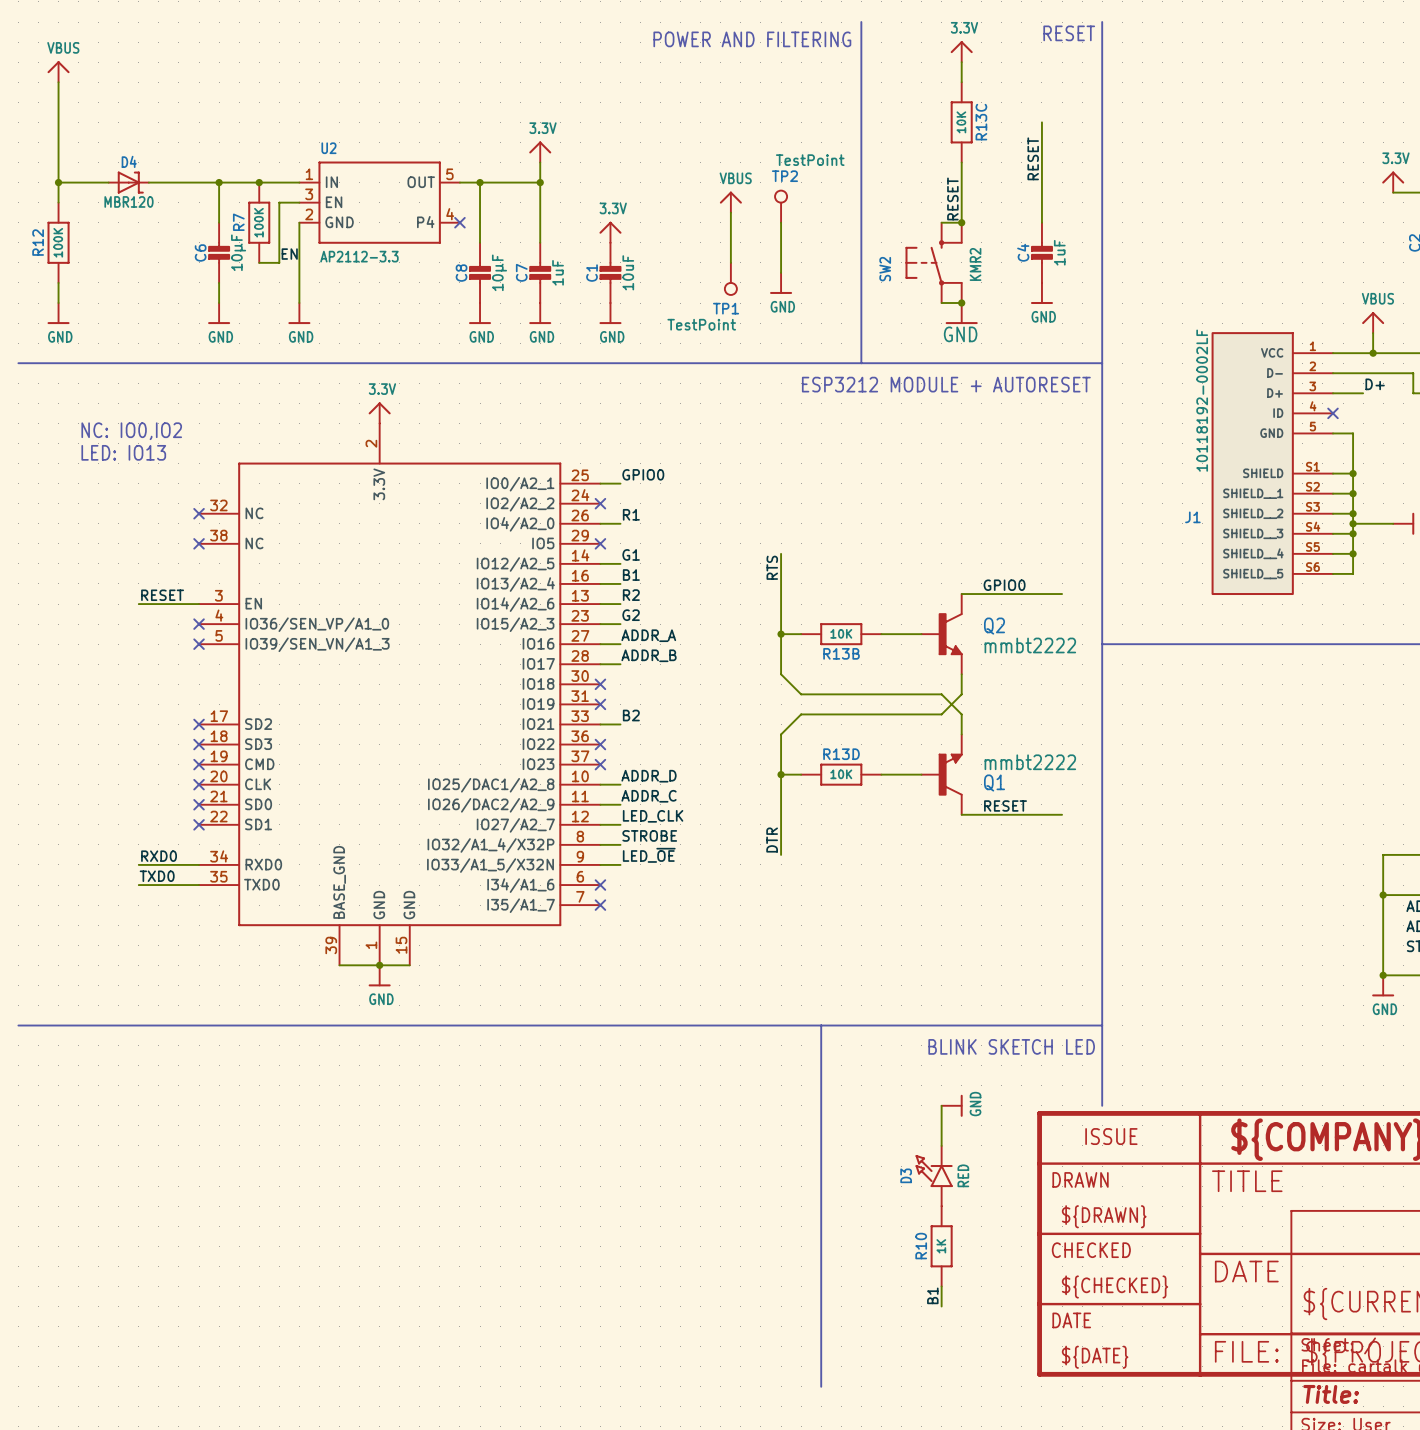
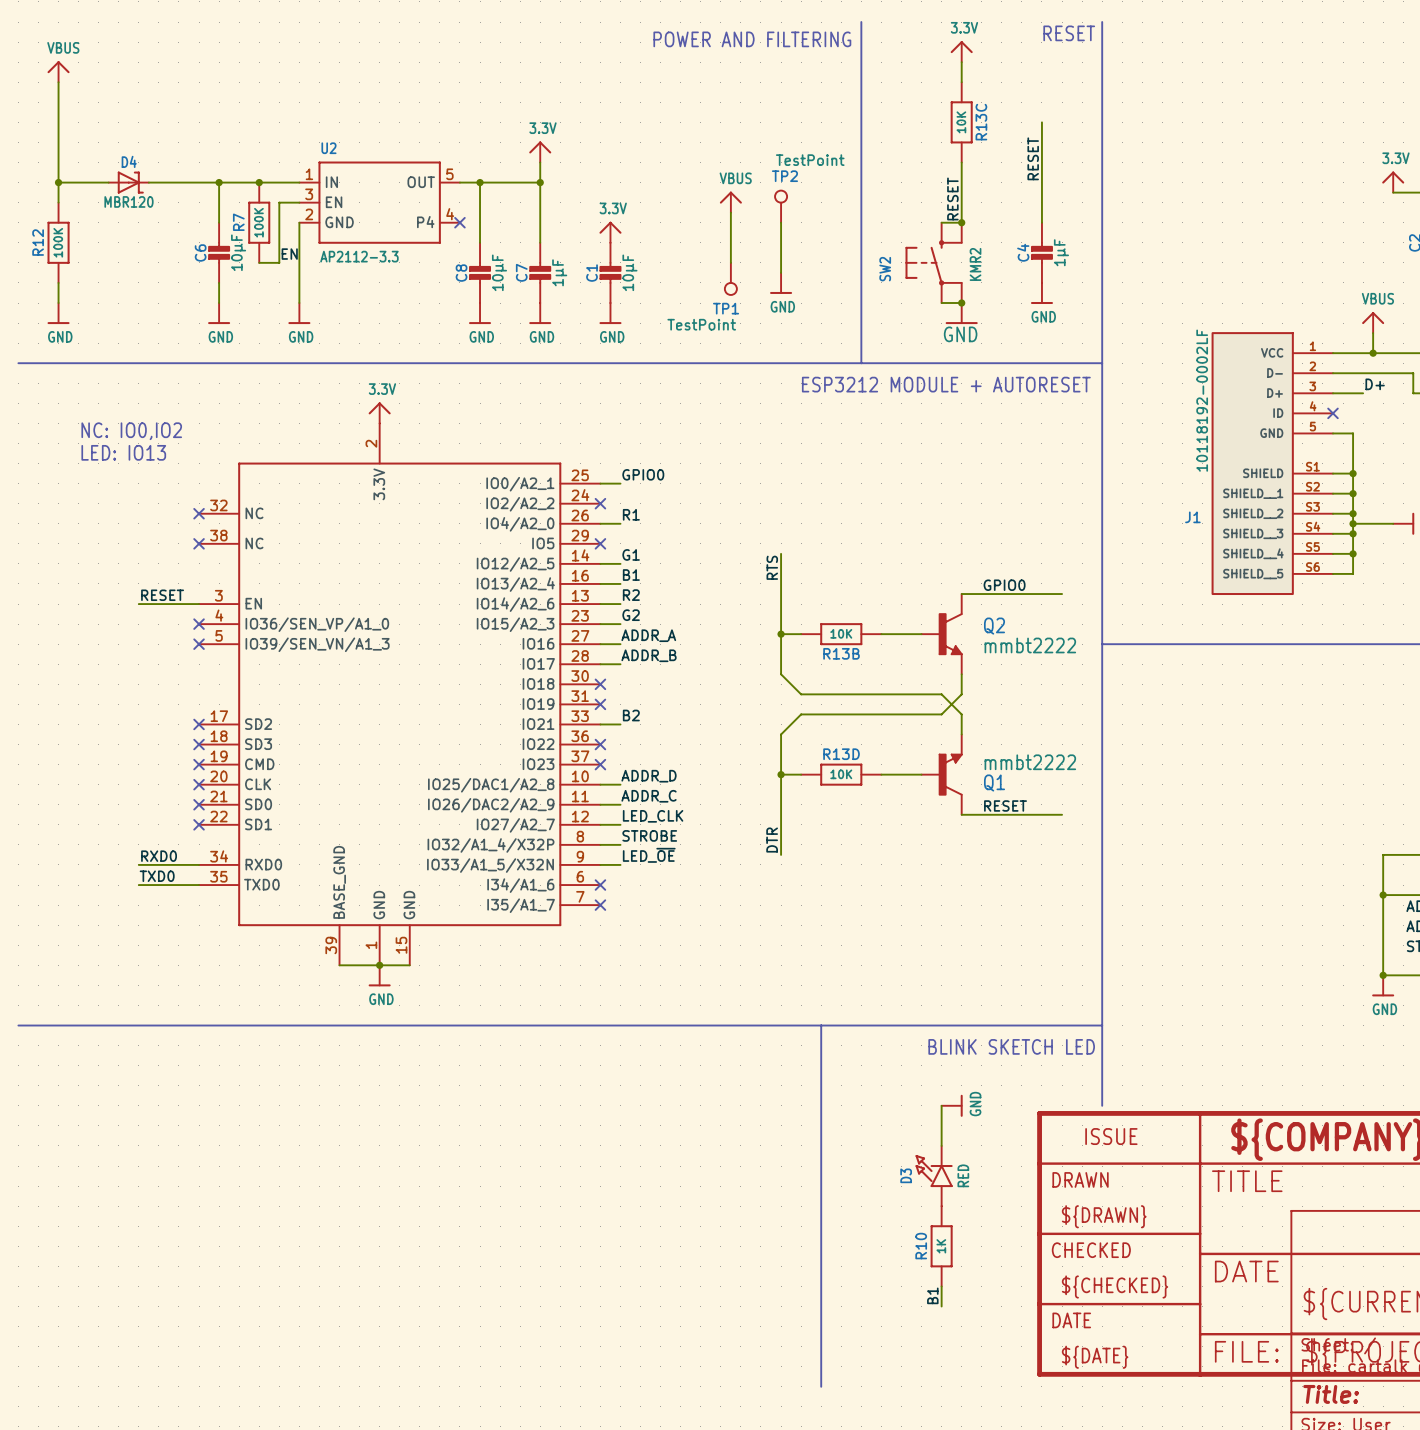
C4 value: 1uF (1059, 252) -> 1µF (1061, 252)
C7 value: 1uF (558, 272) -> 1µF (559, 272)
C1 value: 10uF (628, 272) -> 10µF (629, 272)

